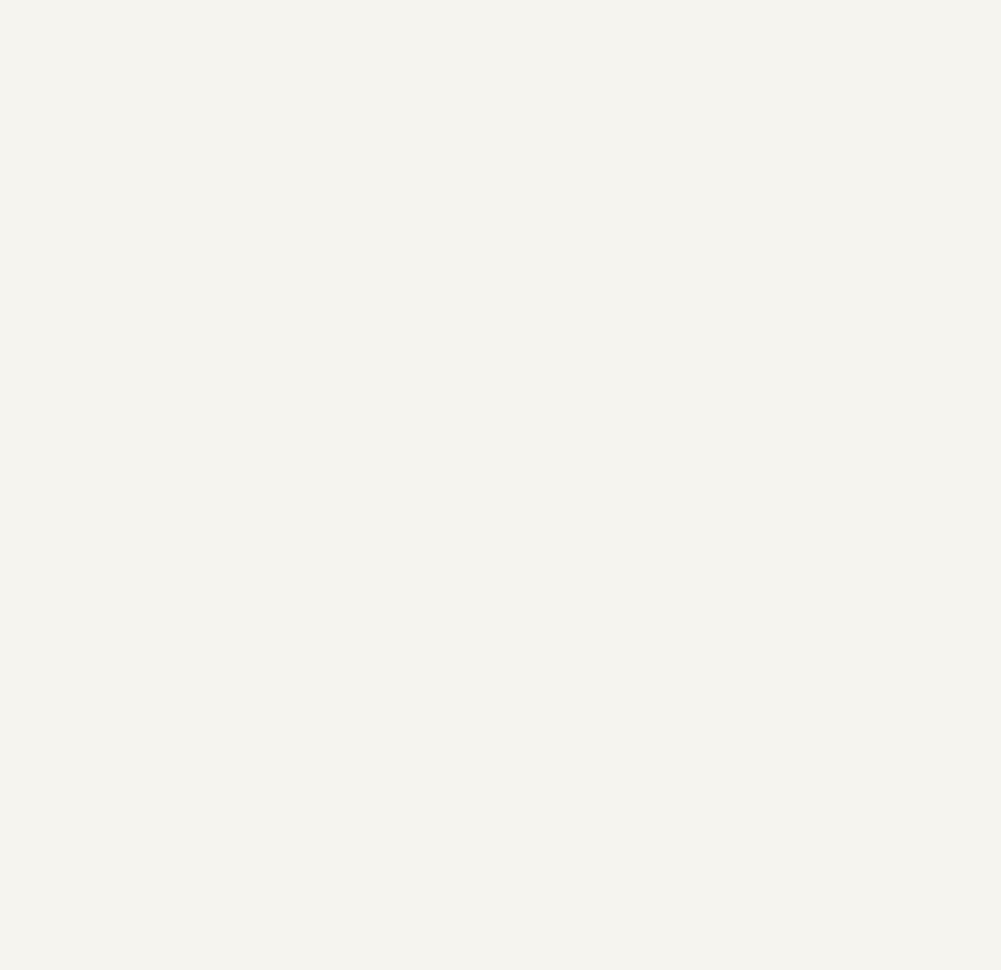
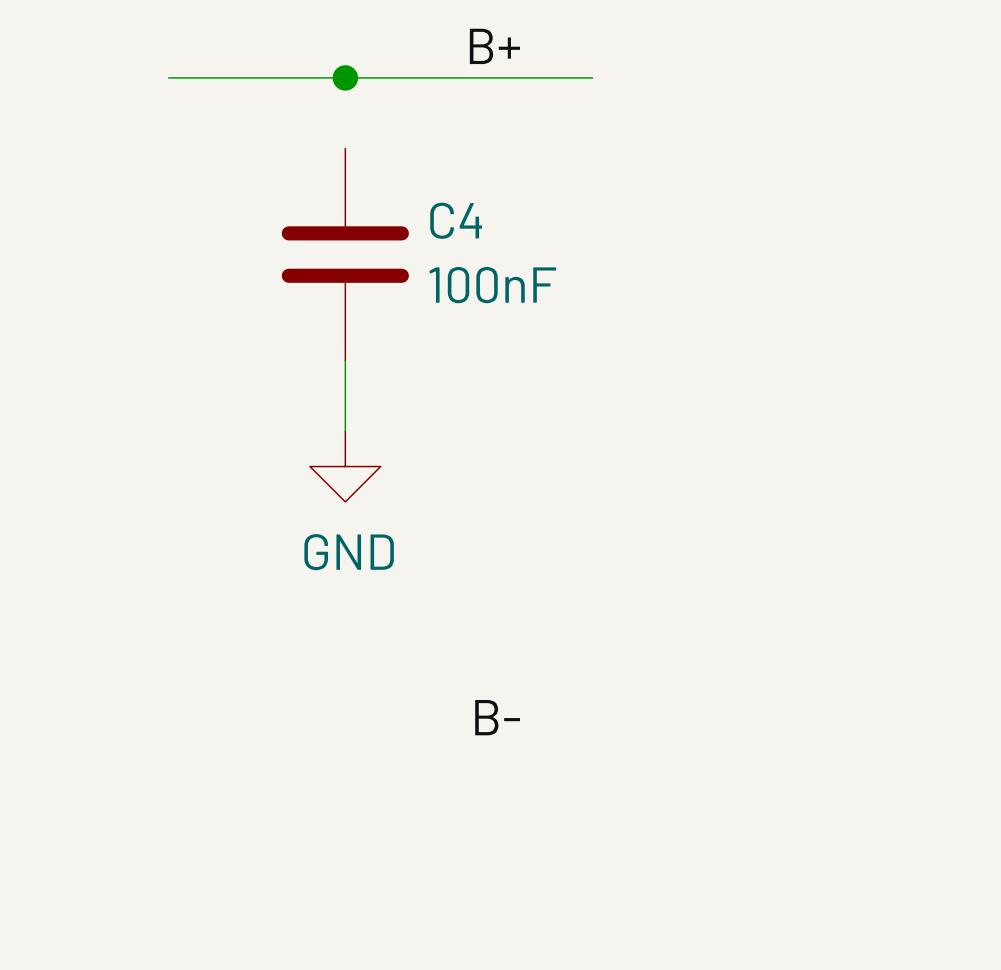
label: none -> B+ (494, 46)
wire: none -> (168, 77) (592, 77)
junction: none -> (345, 77)
C4: none -> 100nF (345, 254)
wire: none -> (345, 360) (345, 431)
power symbol: none -> GND (345, 466)
label: none -> B- (497, 717)

